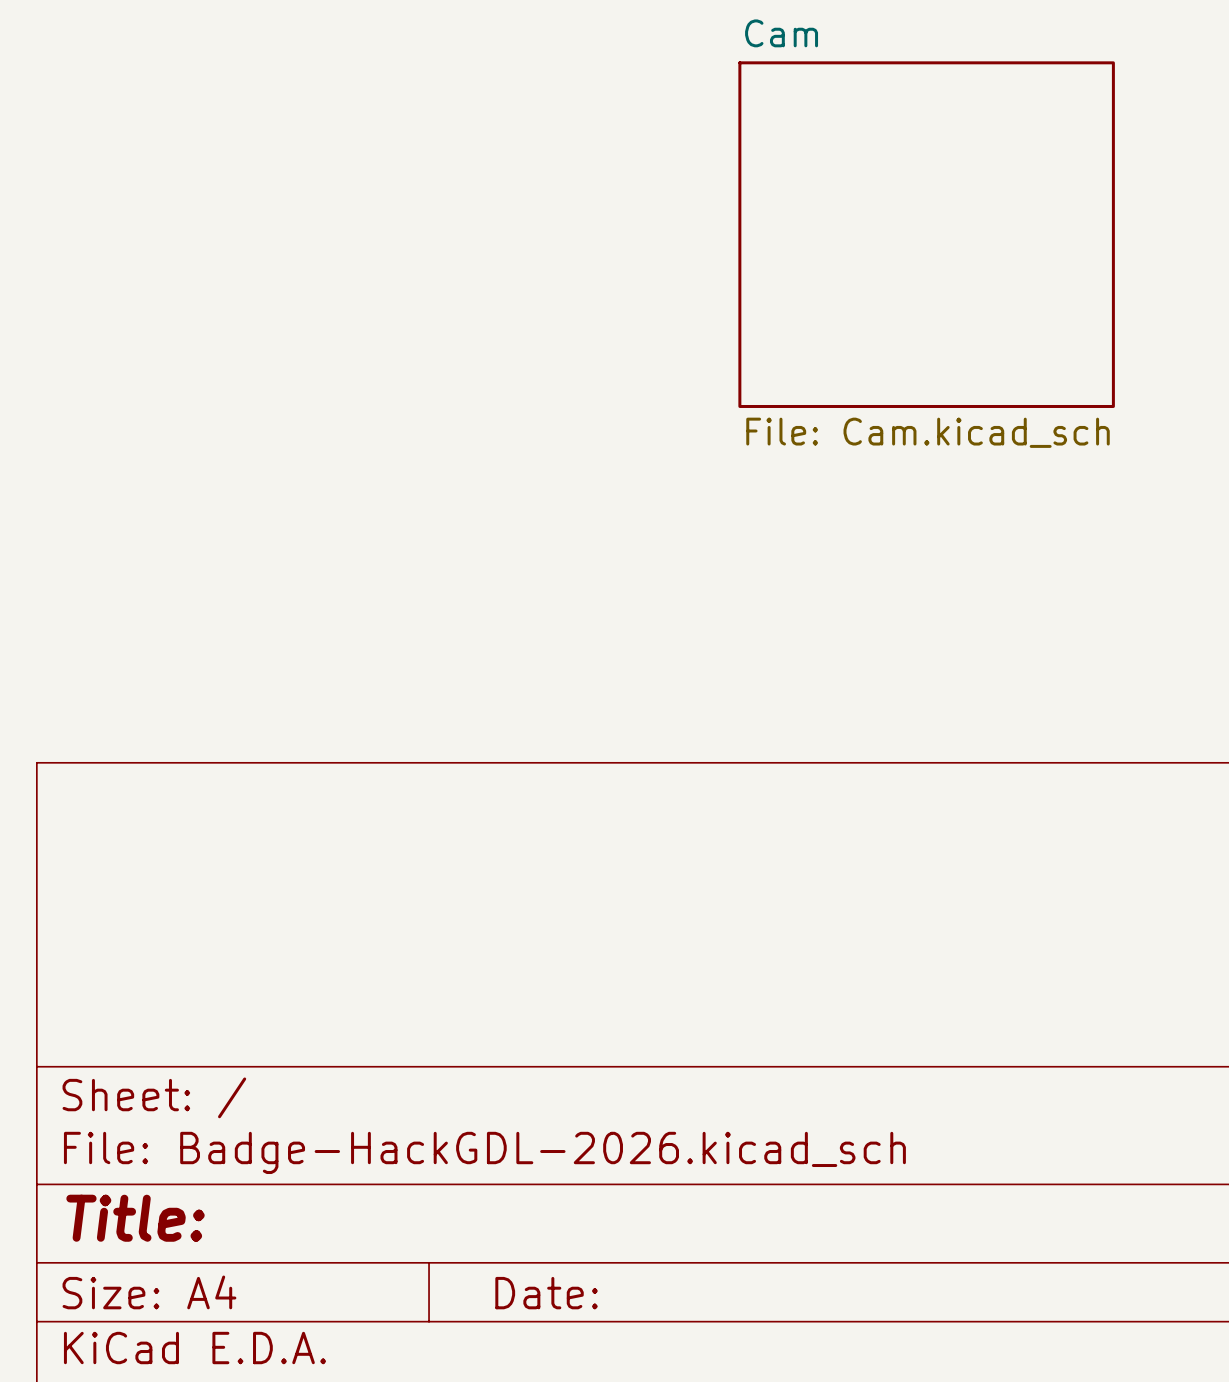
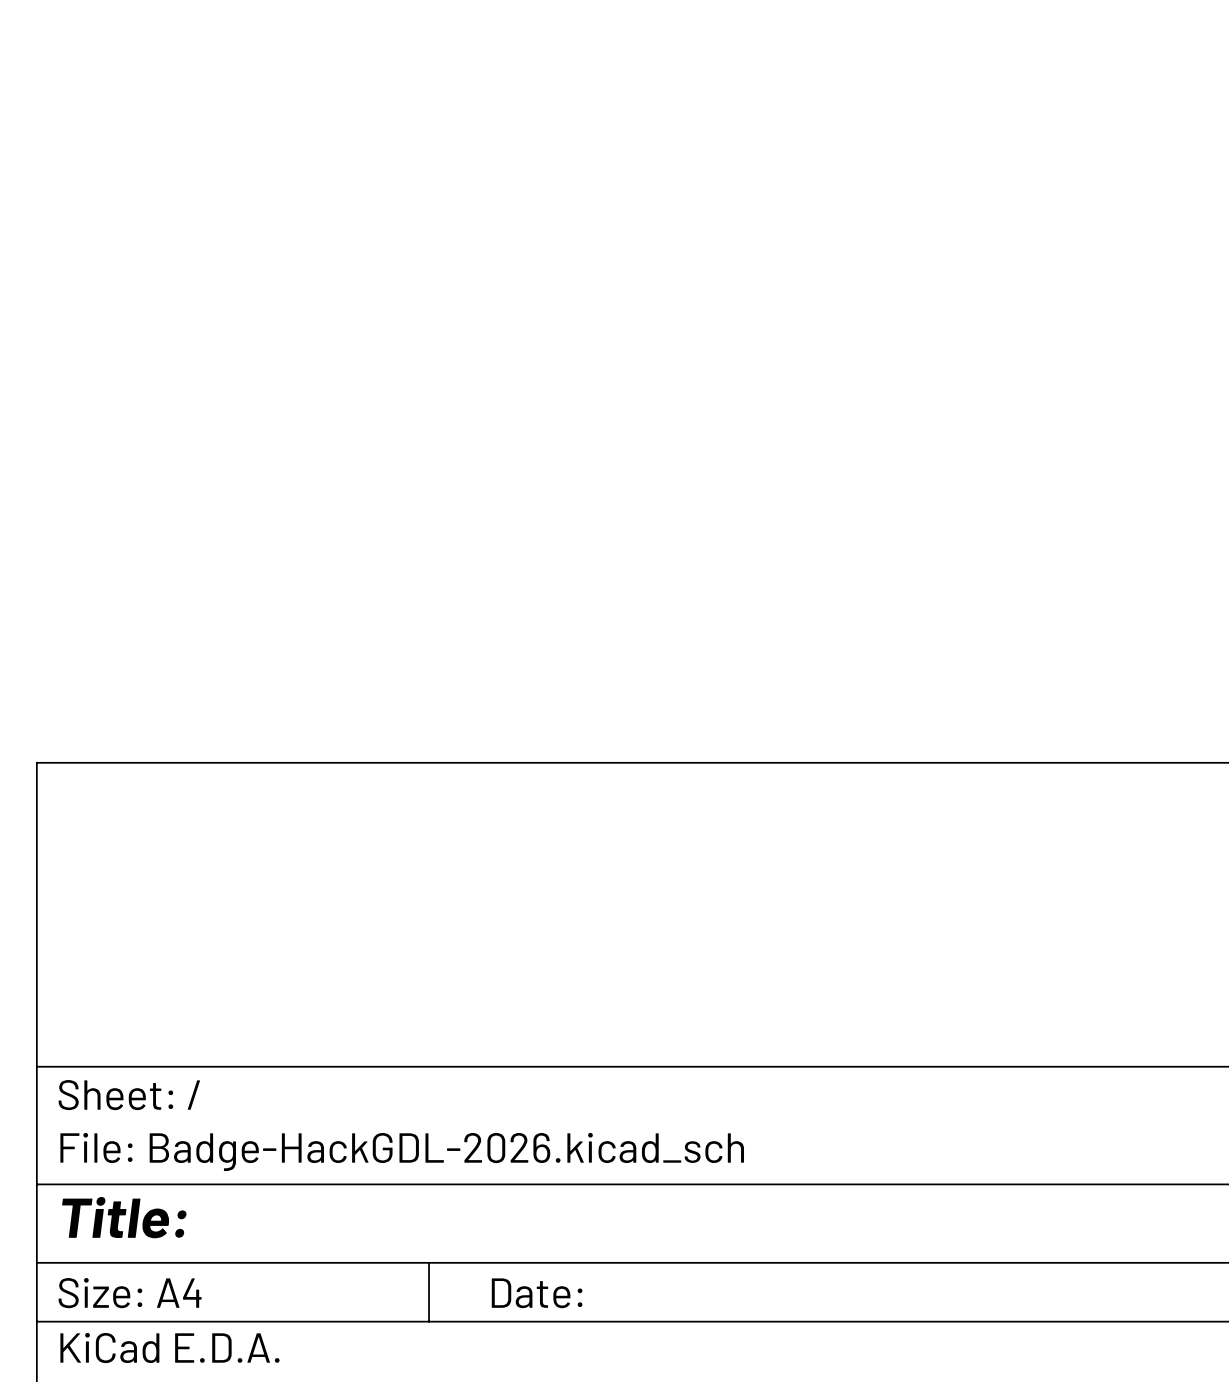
sheet Cam: File: Cam.kicad_sch (926, 234) -> none

